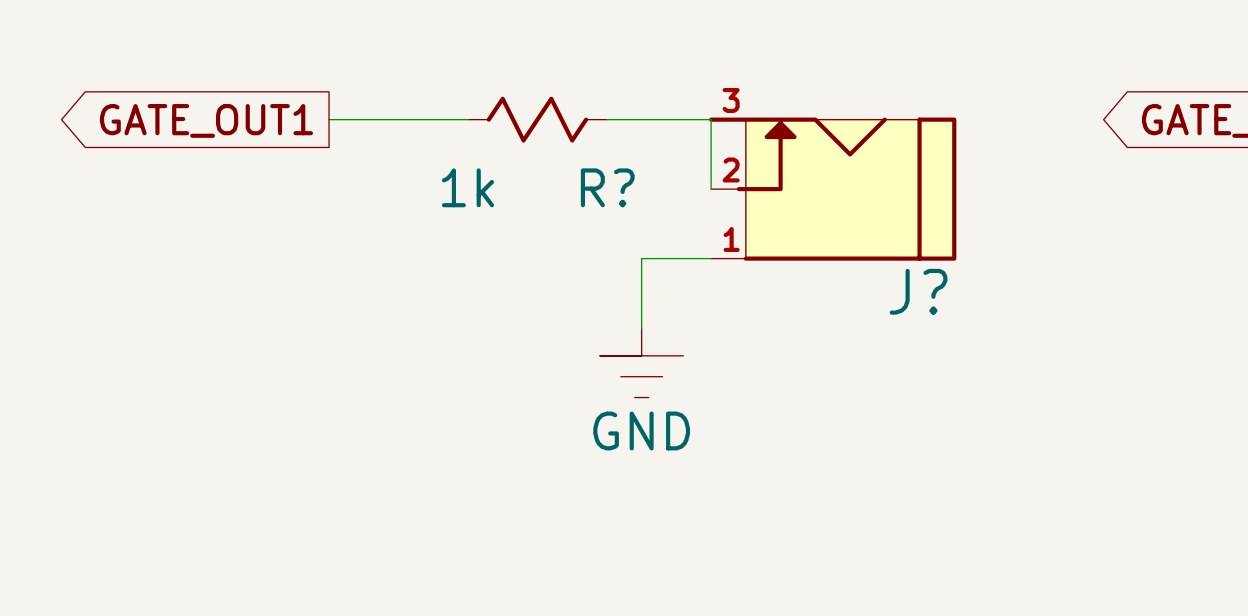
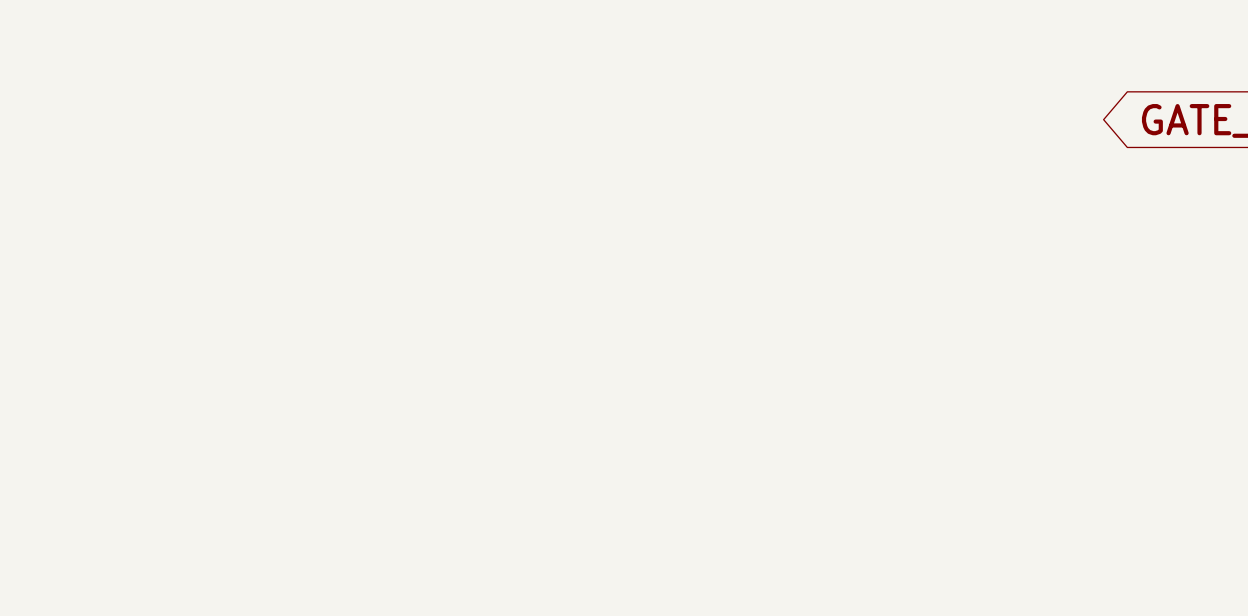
wire: (329, 119) (467, 119) -> none
R?: 1k (537, 119) -> none
wire: (606, 119) (711, 119) (711, 189) -> none
global label: GATE_OUT1 (206, 120) -> none
J?: (832, 189) -> none
wire: (711, 258) (641, 258) (641, 328) -> none
power symbol: GND (641, 362) -> none

